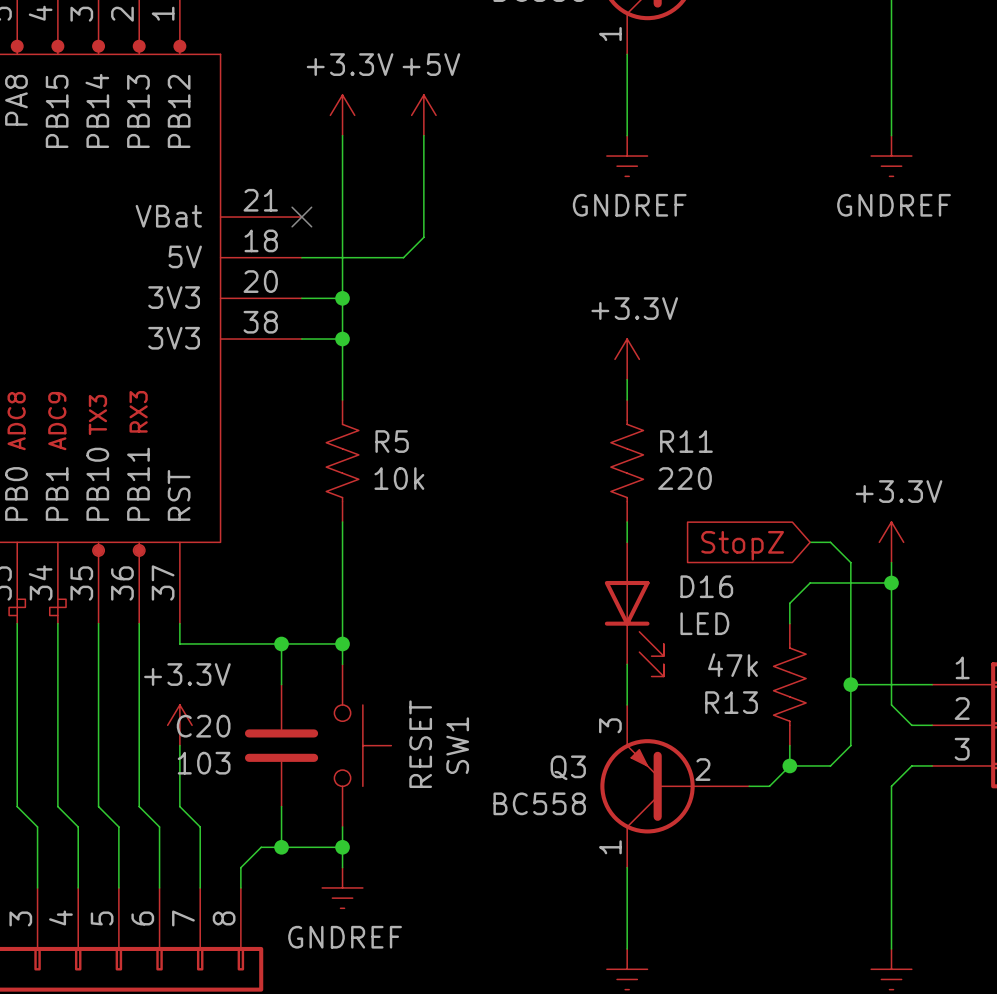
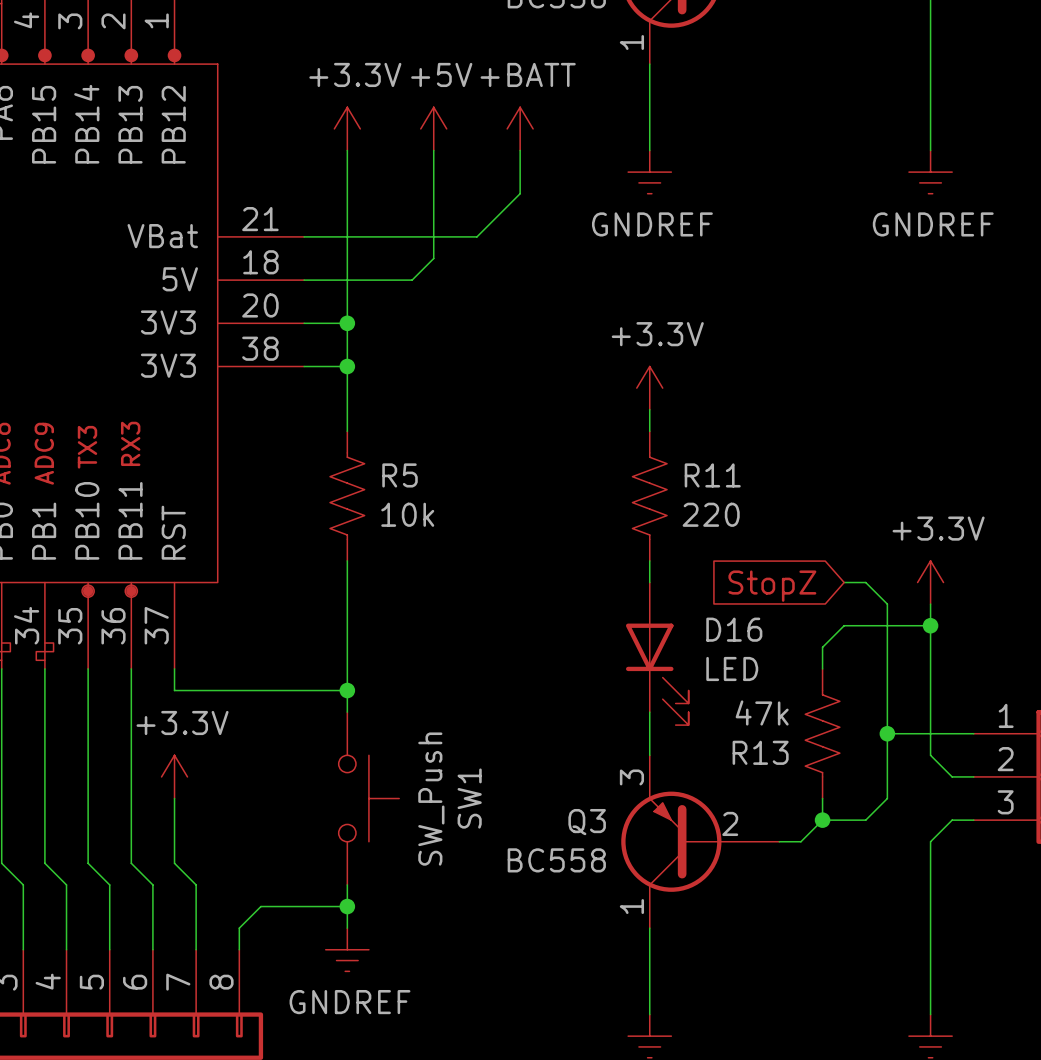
power symbol: none -> +BATT (520, 128)
wire: none -> (520, 150) (520, 193) (476, 236) (304, 236)
no-connect mark: (301, 217) -> none
wire: (281, 643) (281, 684) -> none
junction: (281, 643) -> none
SW1 value: RESET (420, 744) -> SW_Push (431, 799)
C20: 103 (281, 745) -> none
wire: (281, 806) (281, 847) -> none
junction: (281, 847) -> none

